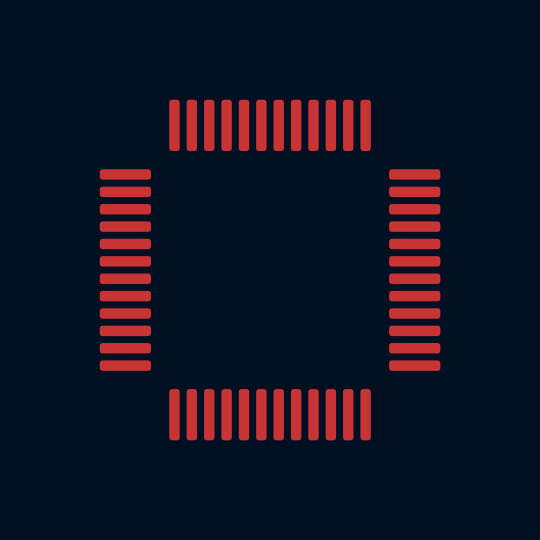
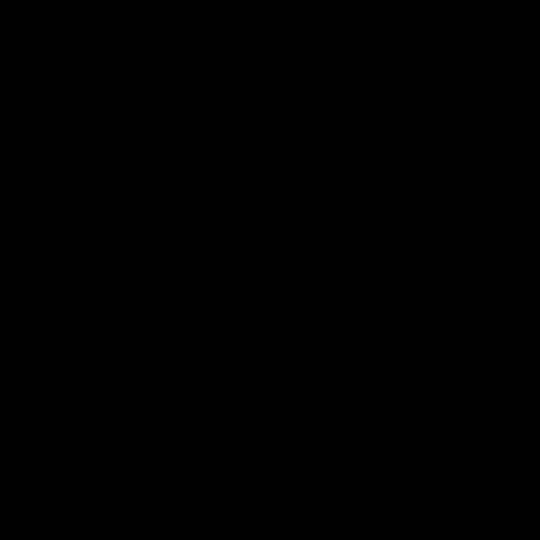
part: (270, 270) -> none

